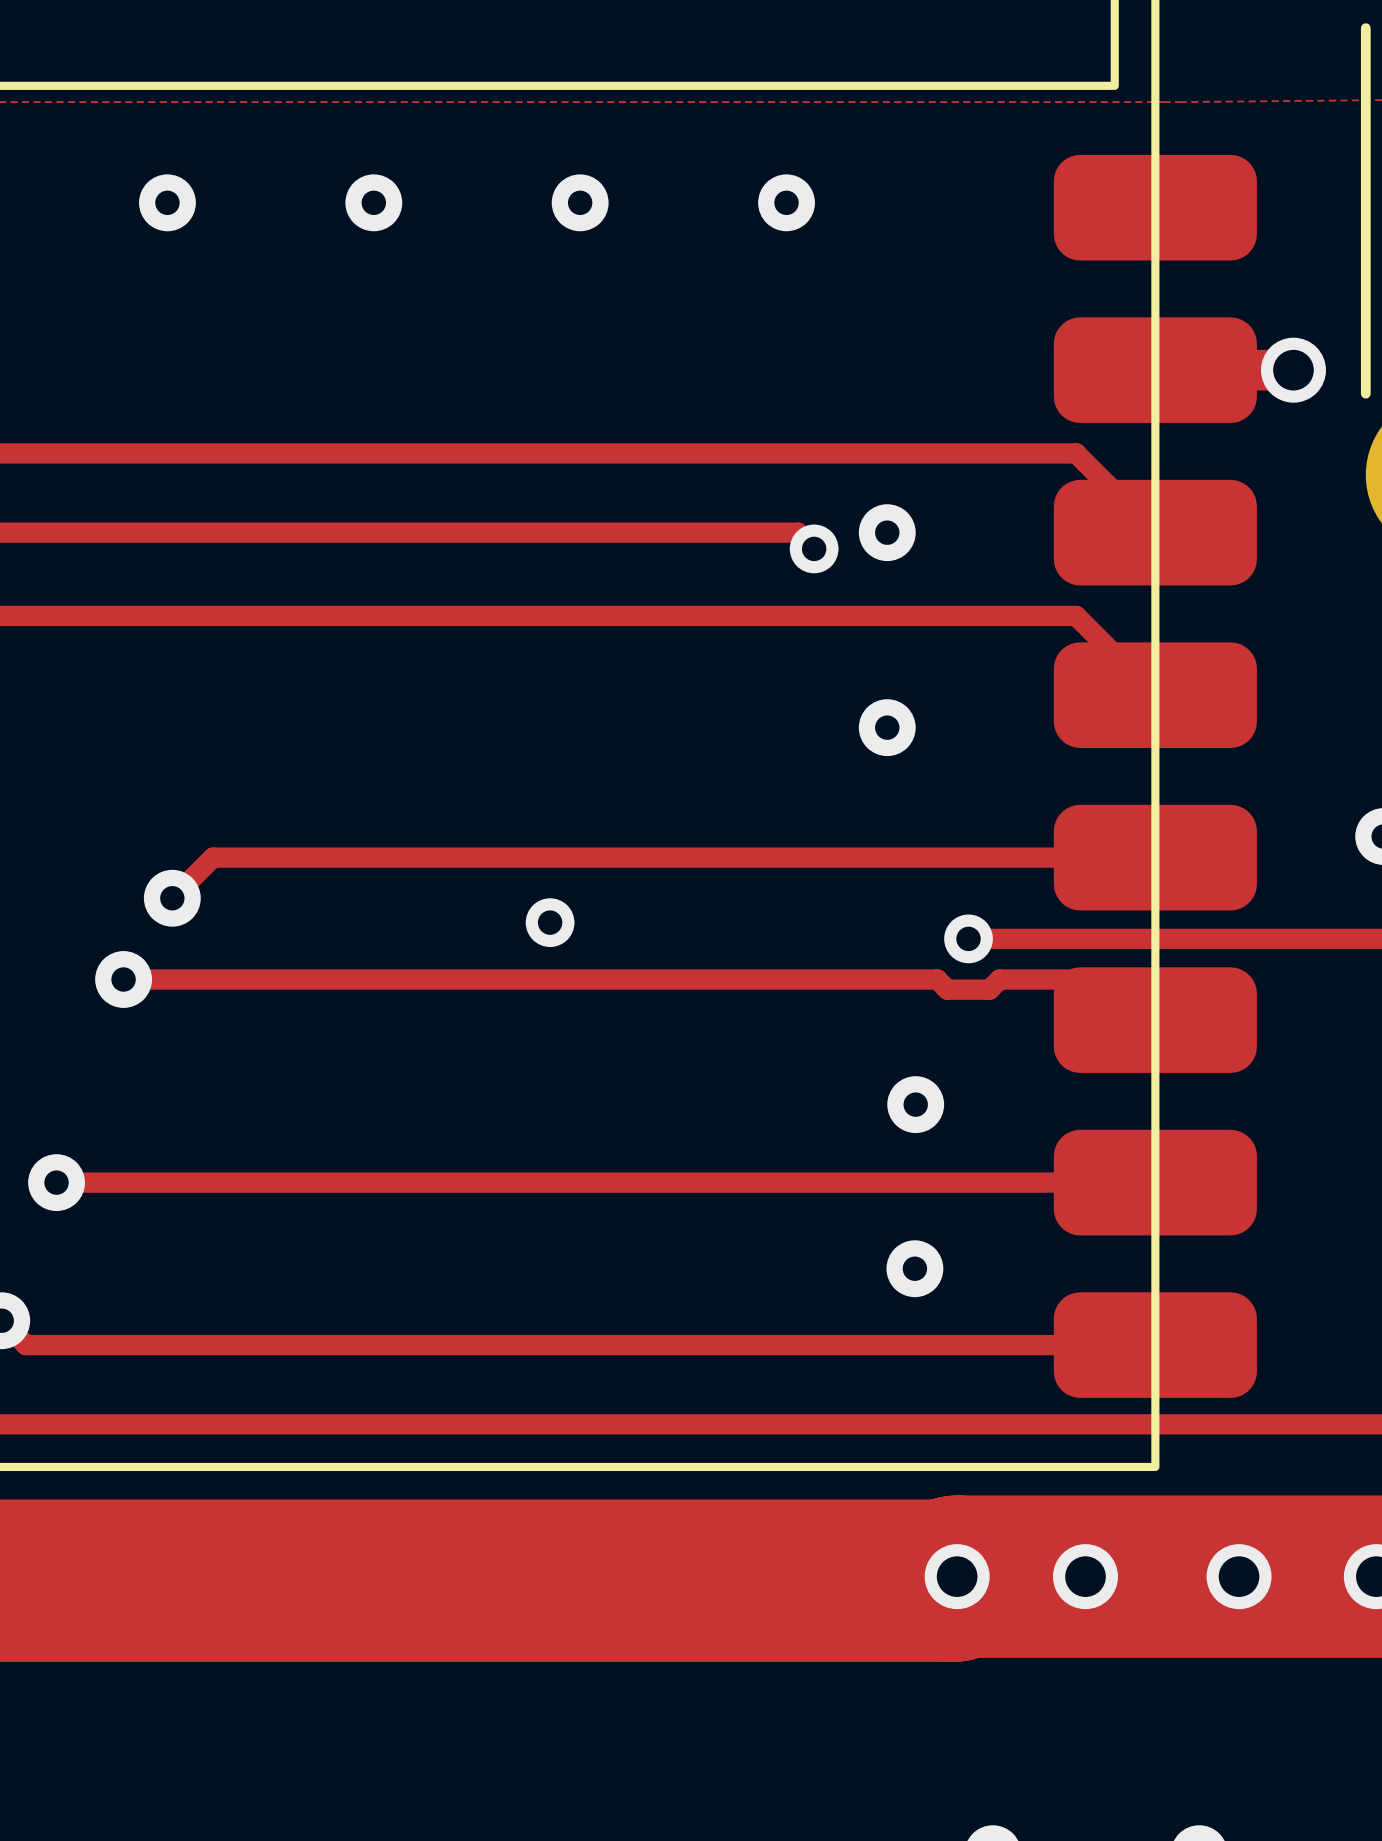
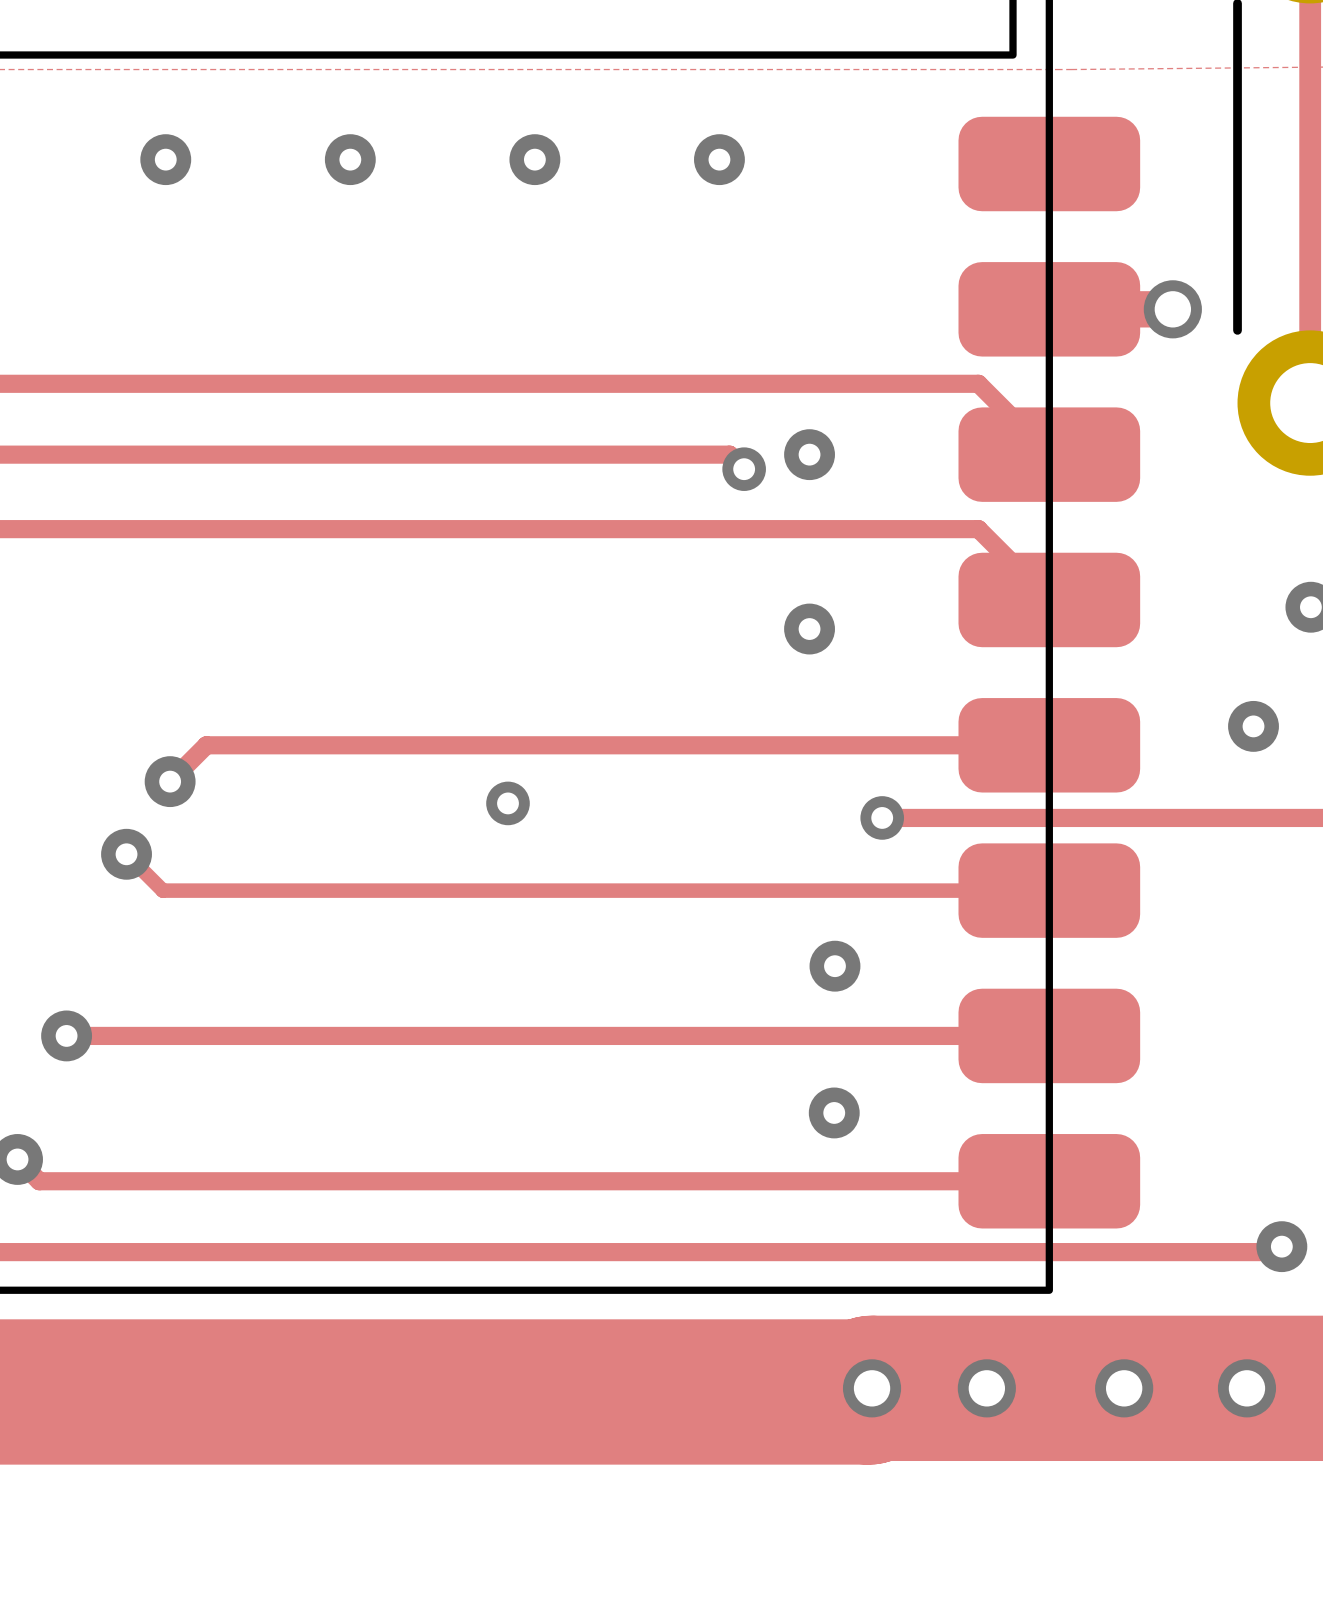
track: (123, 979) (937, 979) (947, 989) (989, 989) (999, 979) (1114, 979) (1155, 1020) -> (126, 854) (162, 890) (1049, 890)

